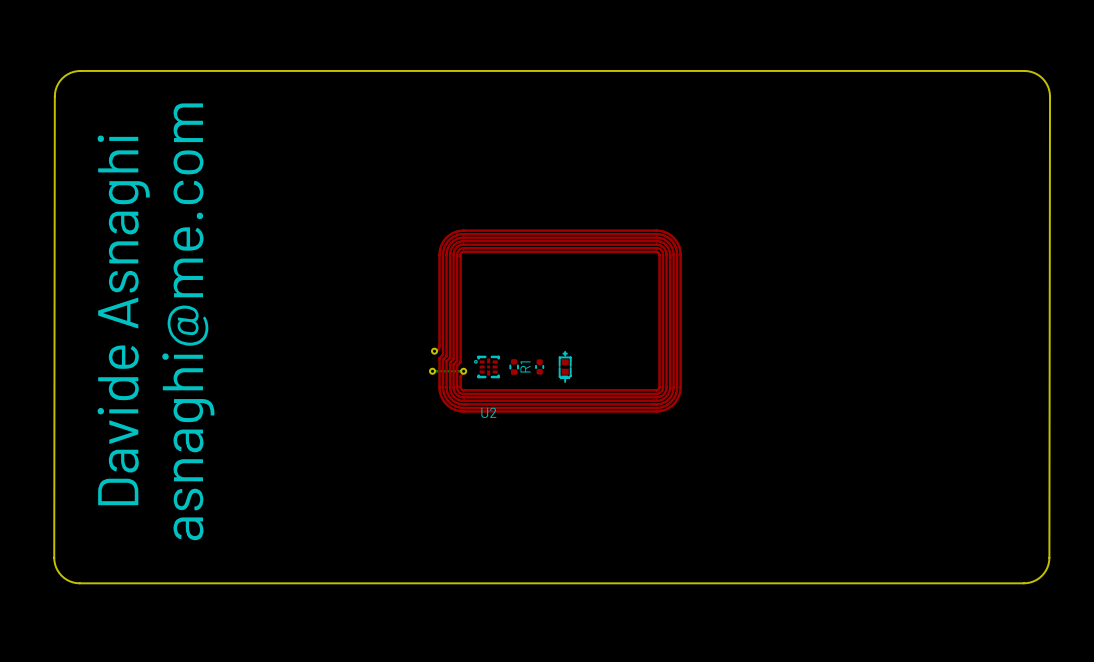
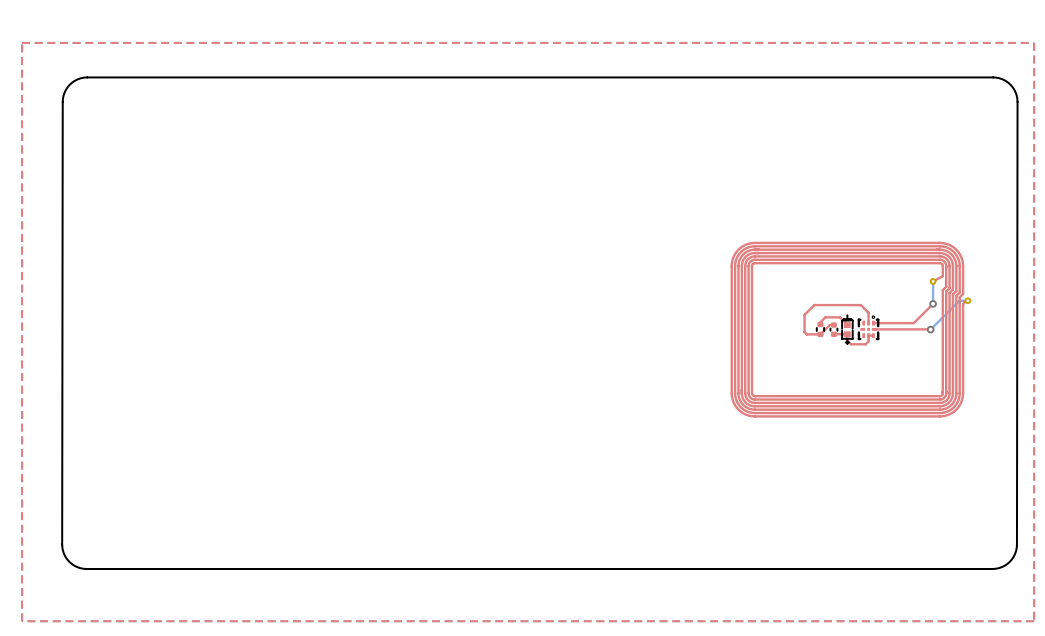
top zone outline: none -> (22, 42) (1034, 42) (1034, 621) (22, 621) (22, 42)
bottom track: none -> (933, 281) (933, 303)
bottom track: none -> (967, 300) (959, 300) (930, 329)
top track: none -> (933, 303) (913, 323) (873, 323)
via: none -> (933, 303)
text: Davide Asnaghi (123, 320) -> none
text: asnaghi@me.com (188, 321) -> none
part: (555, 321) -> none
top track: none -> (868, 323) (868, 312) (860, 305) (814, 305) (804, 314) (804, 332) (806, 334) (820, 334) (829, 325) (833, 325)
top track: none -> (820, 324) (825, 317) (840, 317) (847, 325)
part: none -> (868, 327)
part: none -> (820, 329)
part: none -> (833, 329)
part: none -> (847, 329)
part: none -> (850, 329)
top track: none -> (874, 329) (930, 329)
via: none -> (930, 329)
top track: none -> (834, 334) (847, 334) (847, 340) (851, 344) (865, 344) (868, 341) (868, 335) (873, 335)
U2: (486, 366) -> none
R1: (514, 366) -> none
part: (539, 366) -> none
part: (565, 366) -> none

